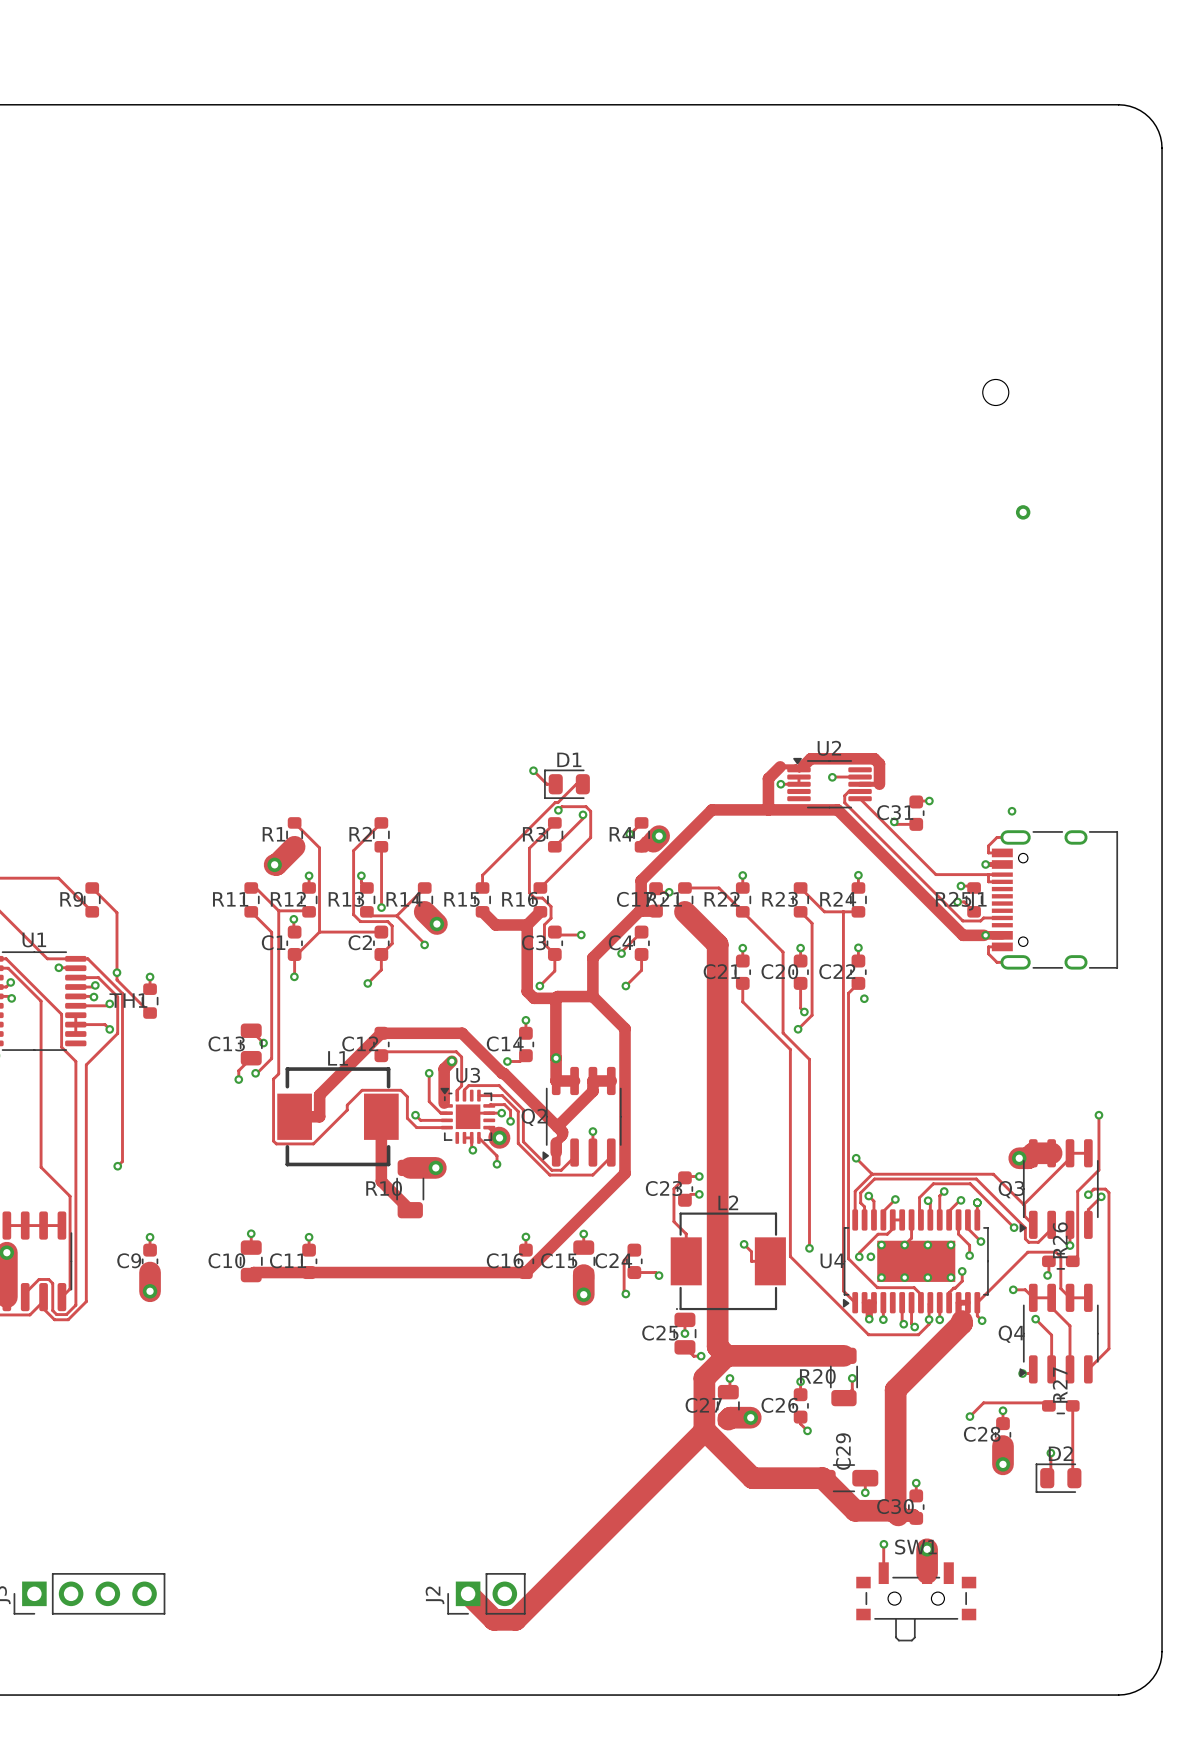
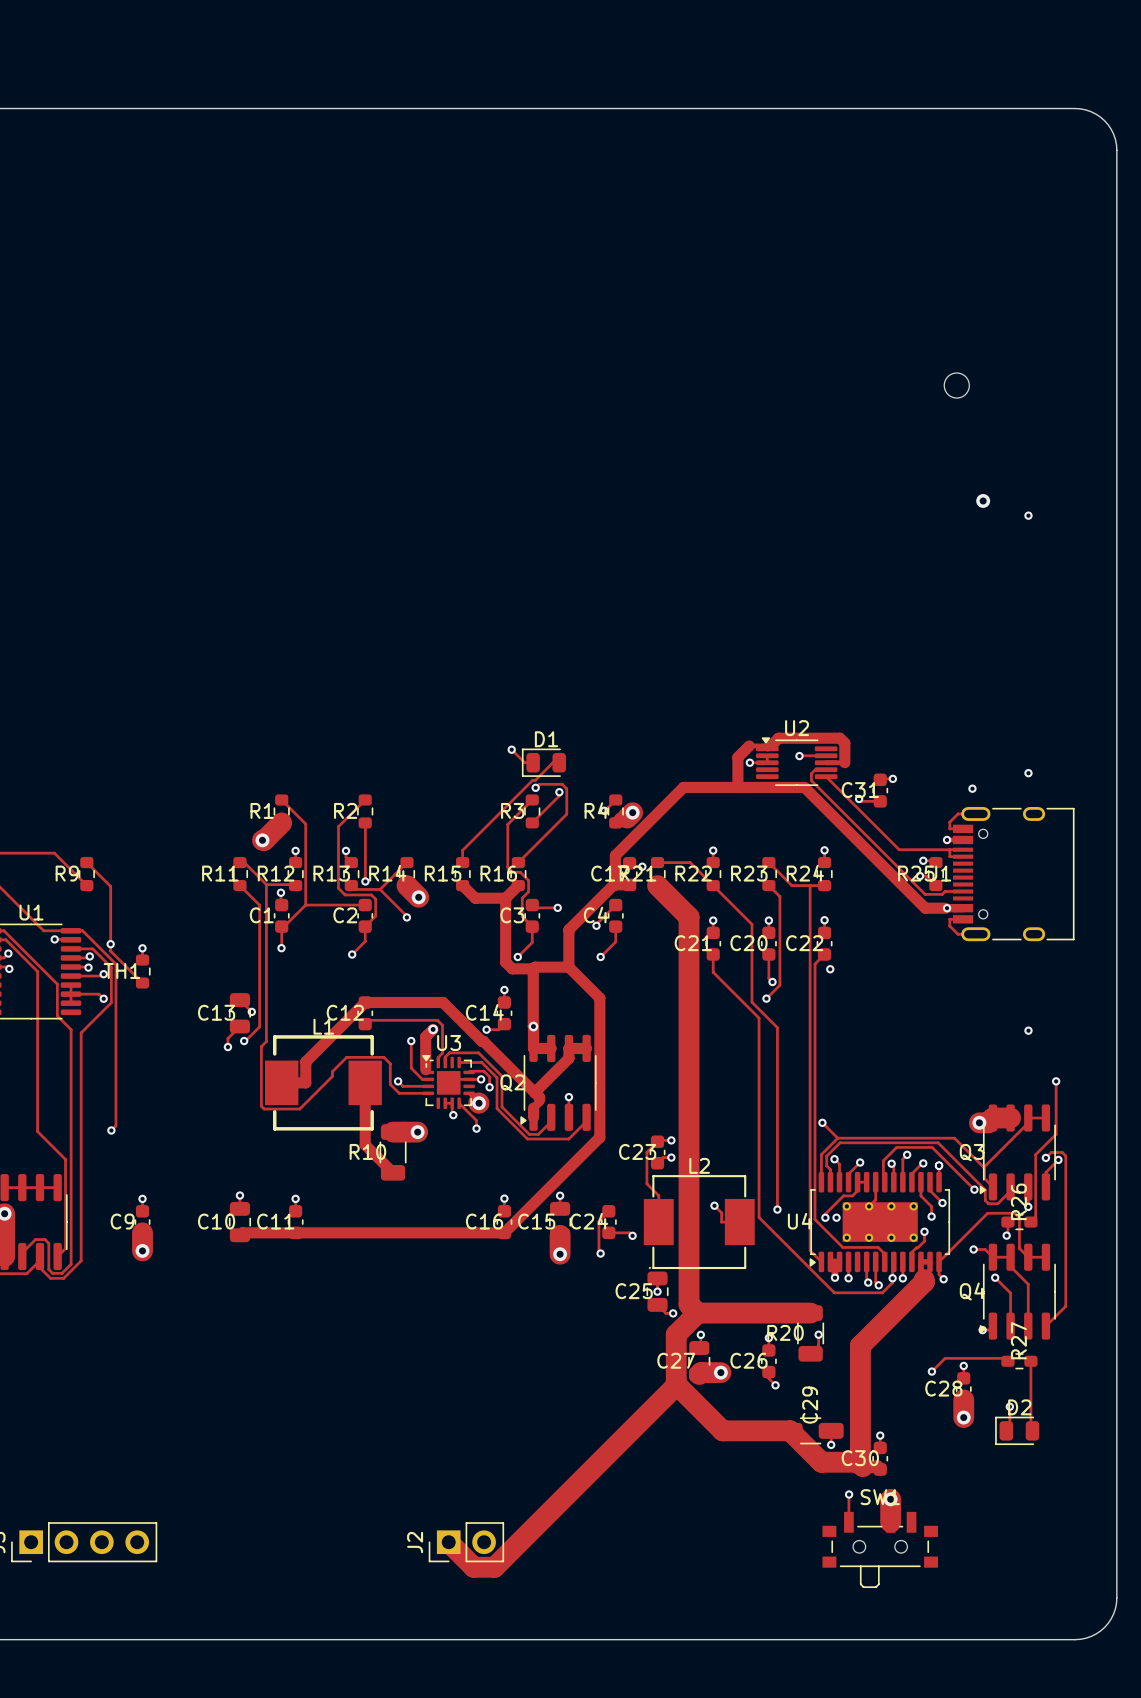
via: none -> (1028, 515)
via: none -> (1028, 773)
via: none -> (1028, 1030)

